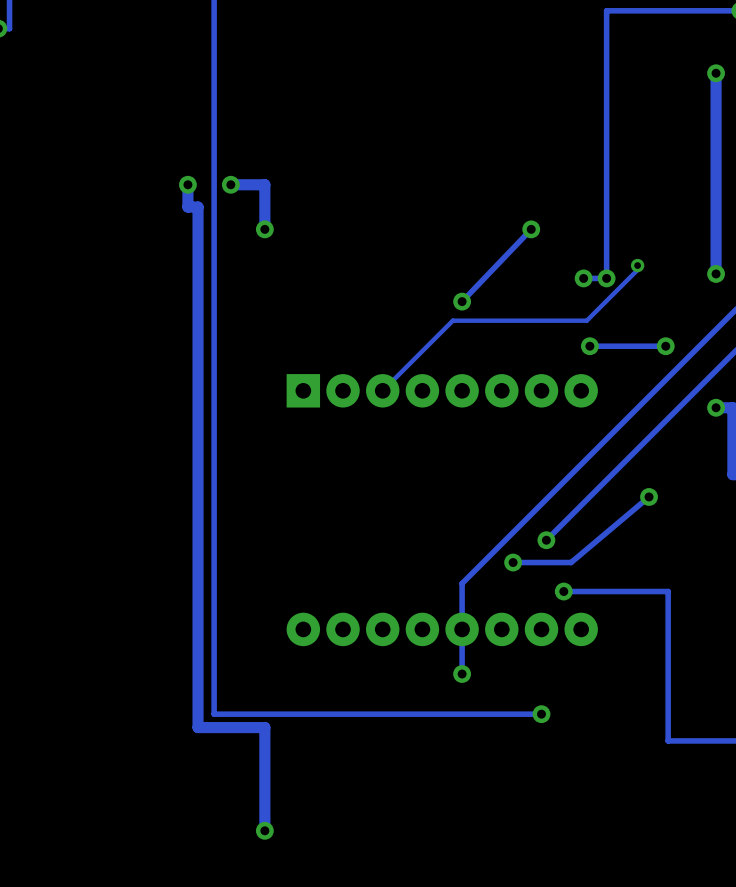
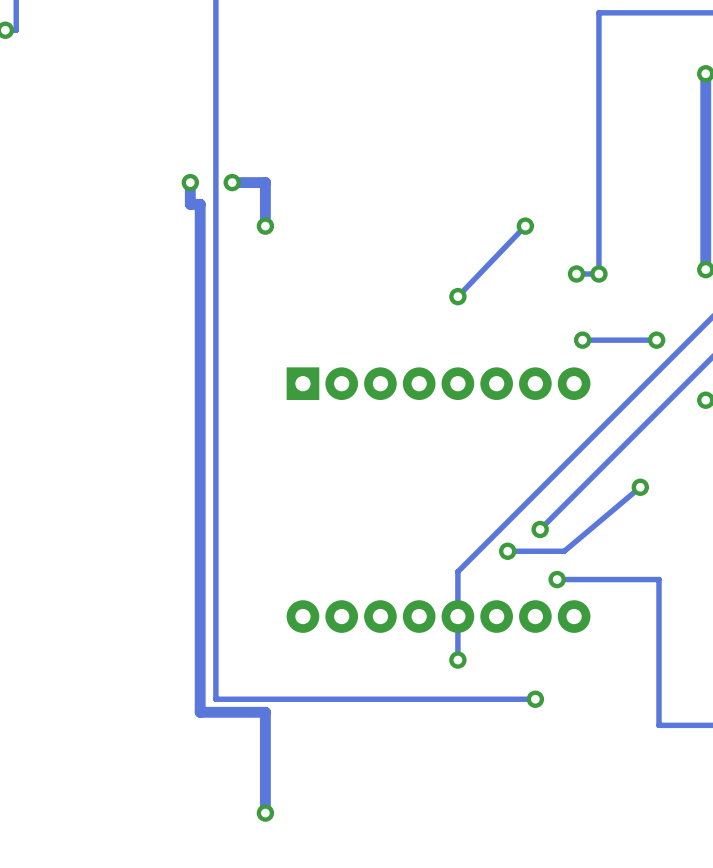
track: (637, 265) (637, 269) (586, 320) (452, 320) (382, 390) -> none
via: (637, 265) -> none

